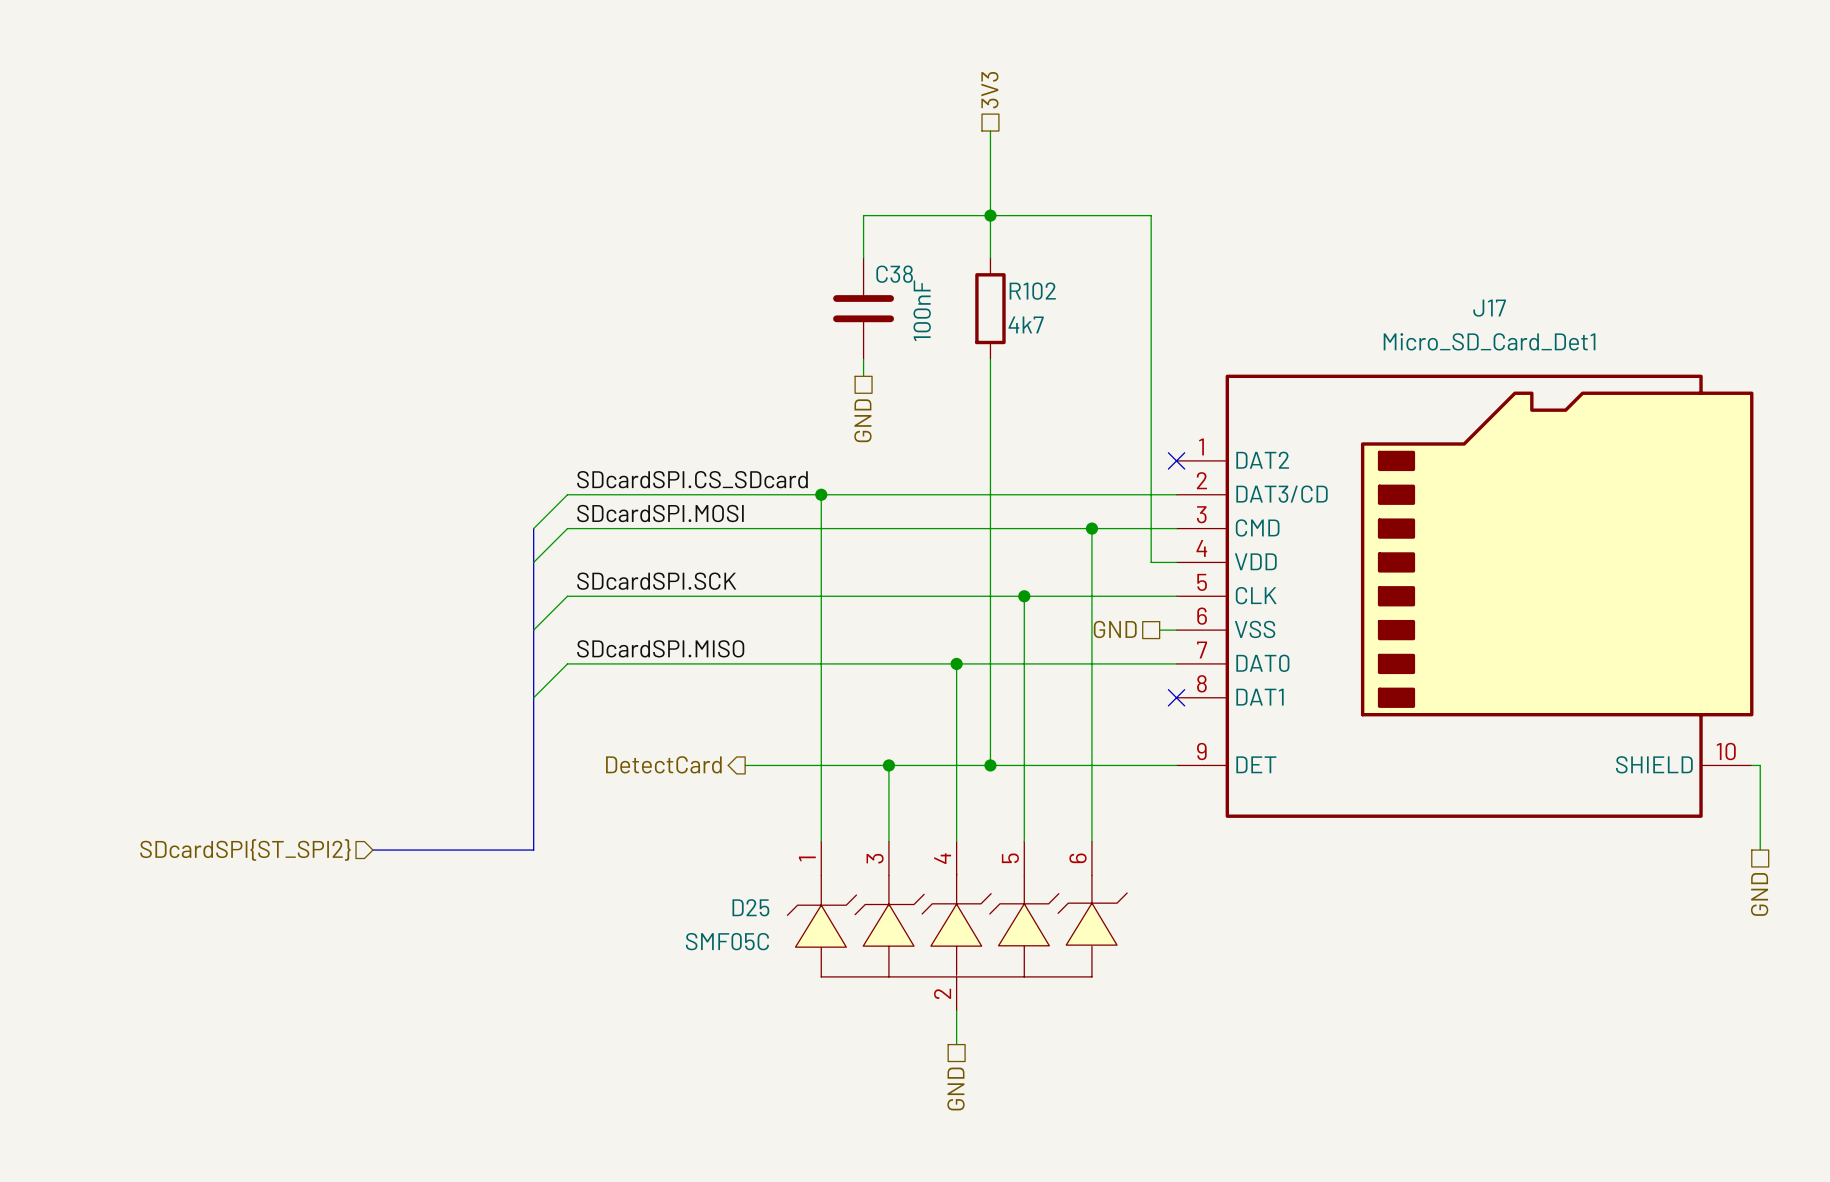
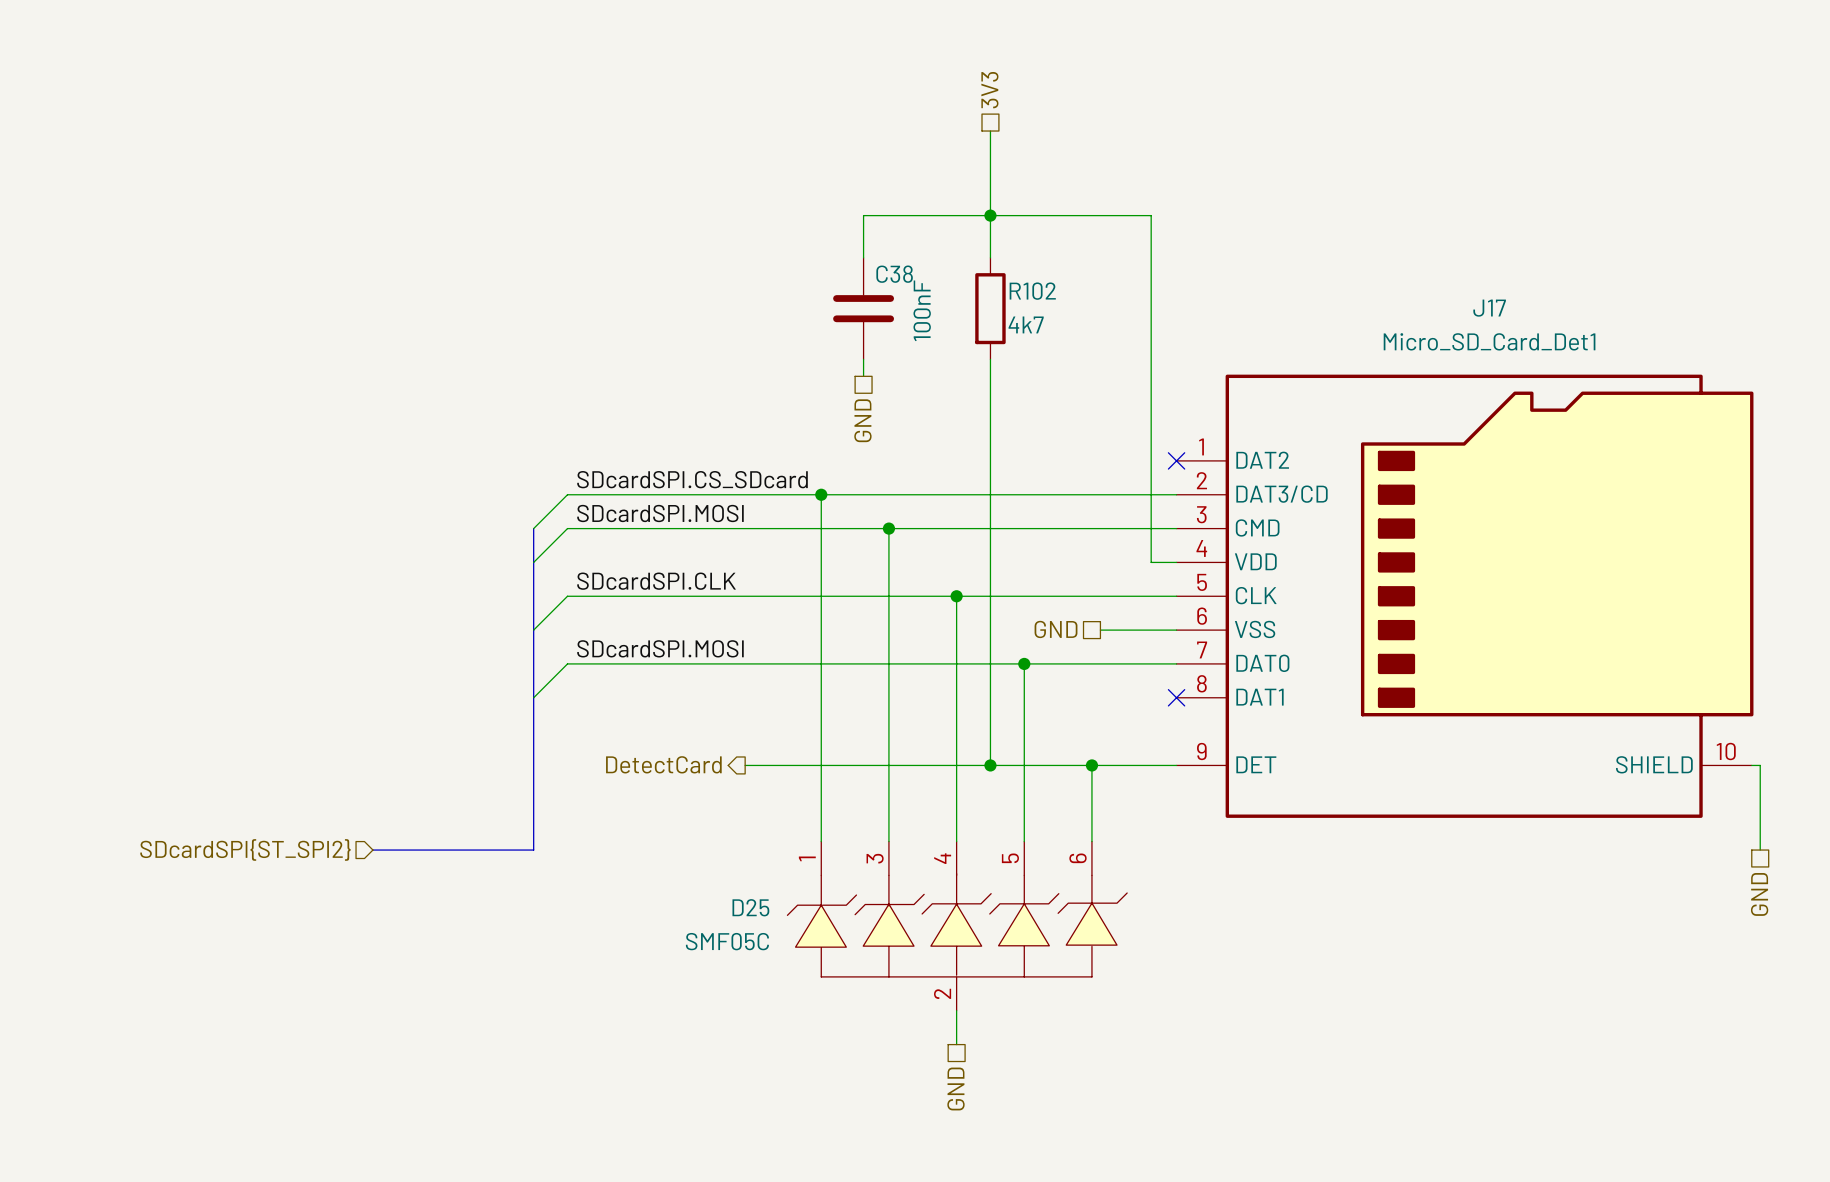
junction: none -> (888, 528)
wire: (1091, 528) (1091, 765) -> (888, 528) (888, 765)
junction: (1091, 528) -> none
label: SDcardSPI.SCK (656, 581) -> SDcardSPI.CLK (656, 581)
junction: none -> (956, 596)
wire: (1024, 596) (1024, 663) -> (956, 596) (956, 663)
junction: (1024, 596) -> none
hierarchical label position: GND (1115, 629) -> GND (1056, 629)
wire: none -> (1100, 630) (1159, 630)
label: SDcardSPI.MISO (660, 648) -> SDcardSPI.MOSI (660, 648)
junction: (956, 663) -> none
junction: none -> (1024, 663)
junction: (888, 765) -> none
junction: none -> (1091, 765)

